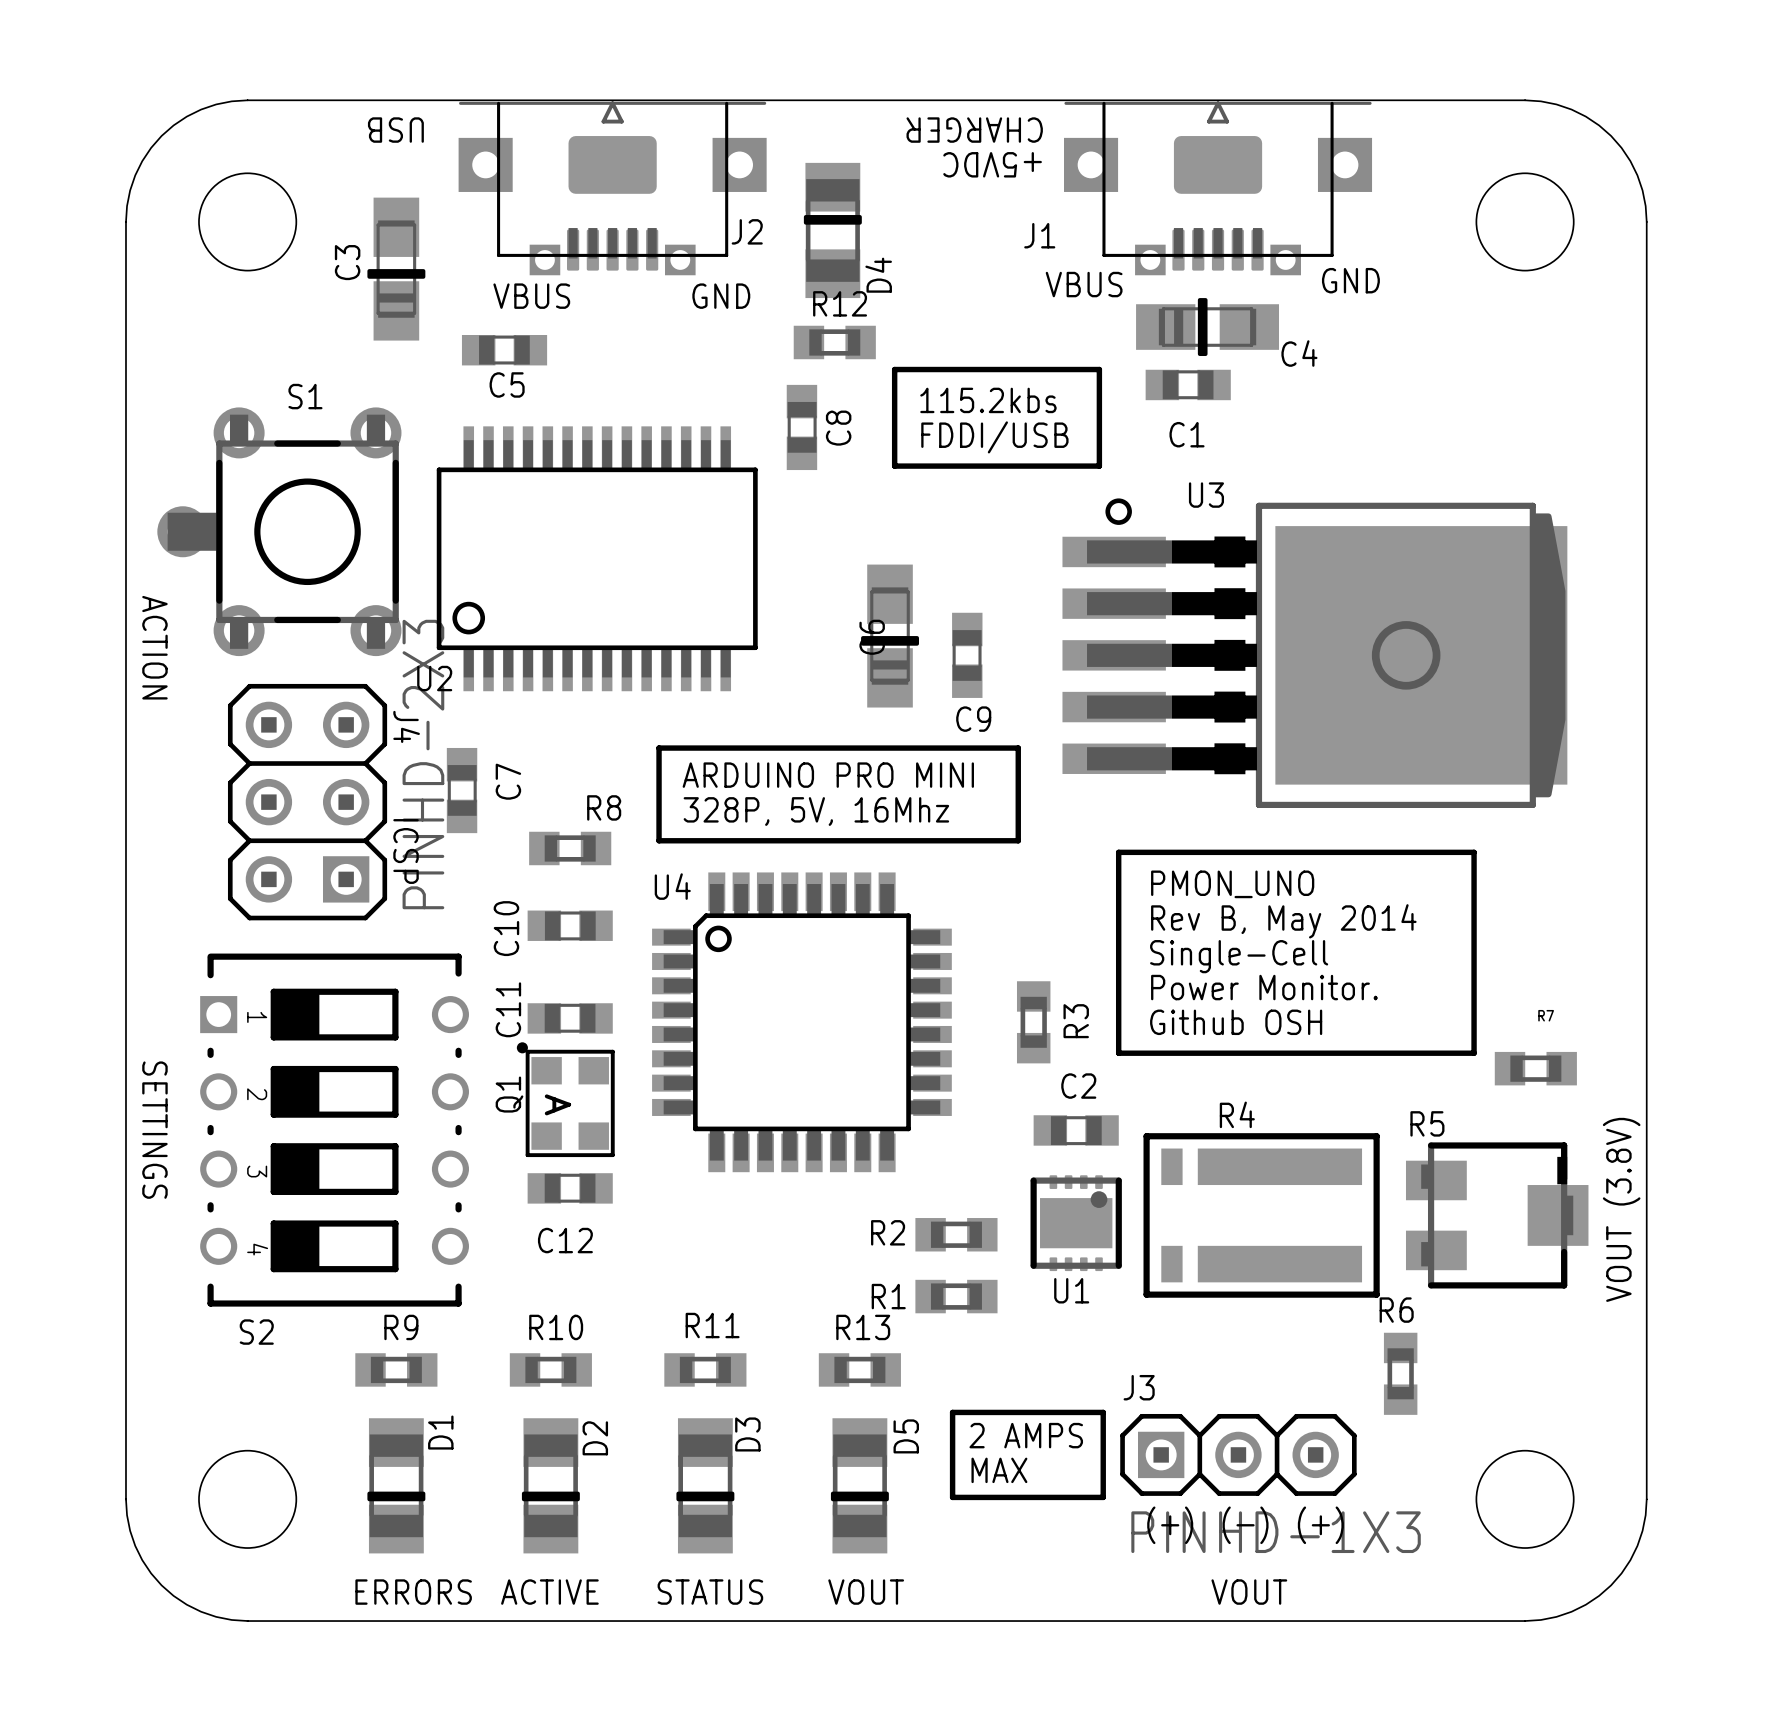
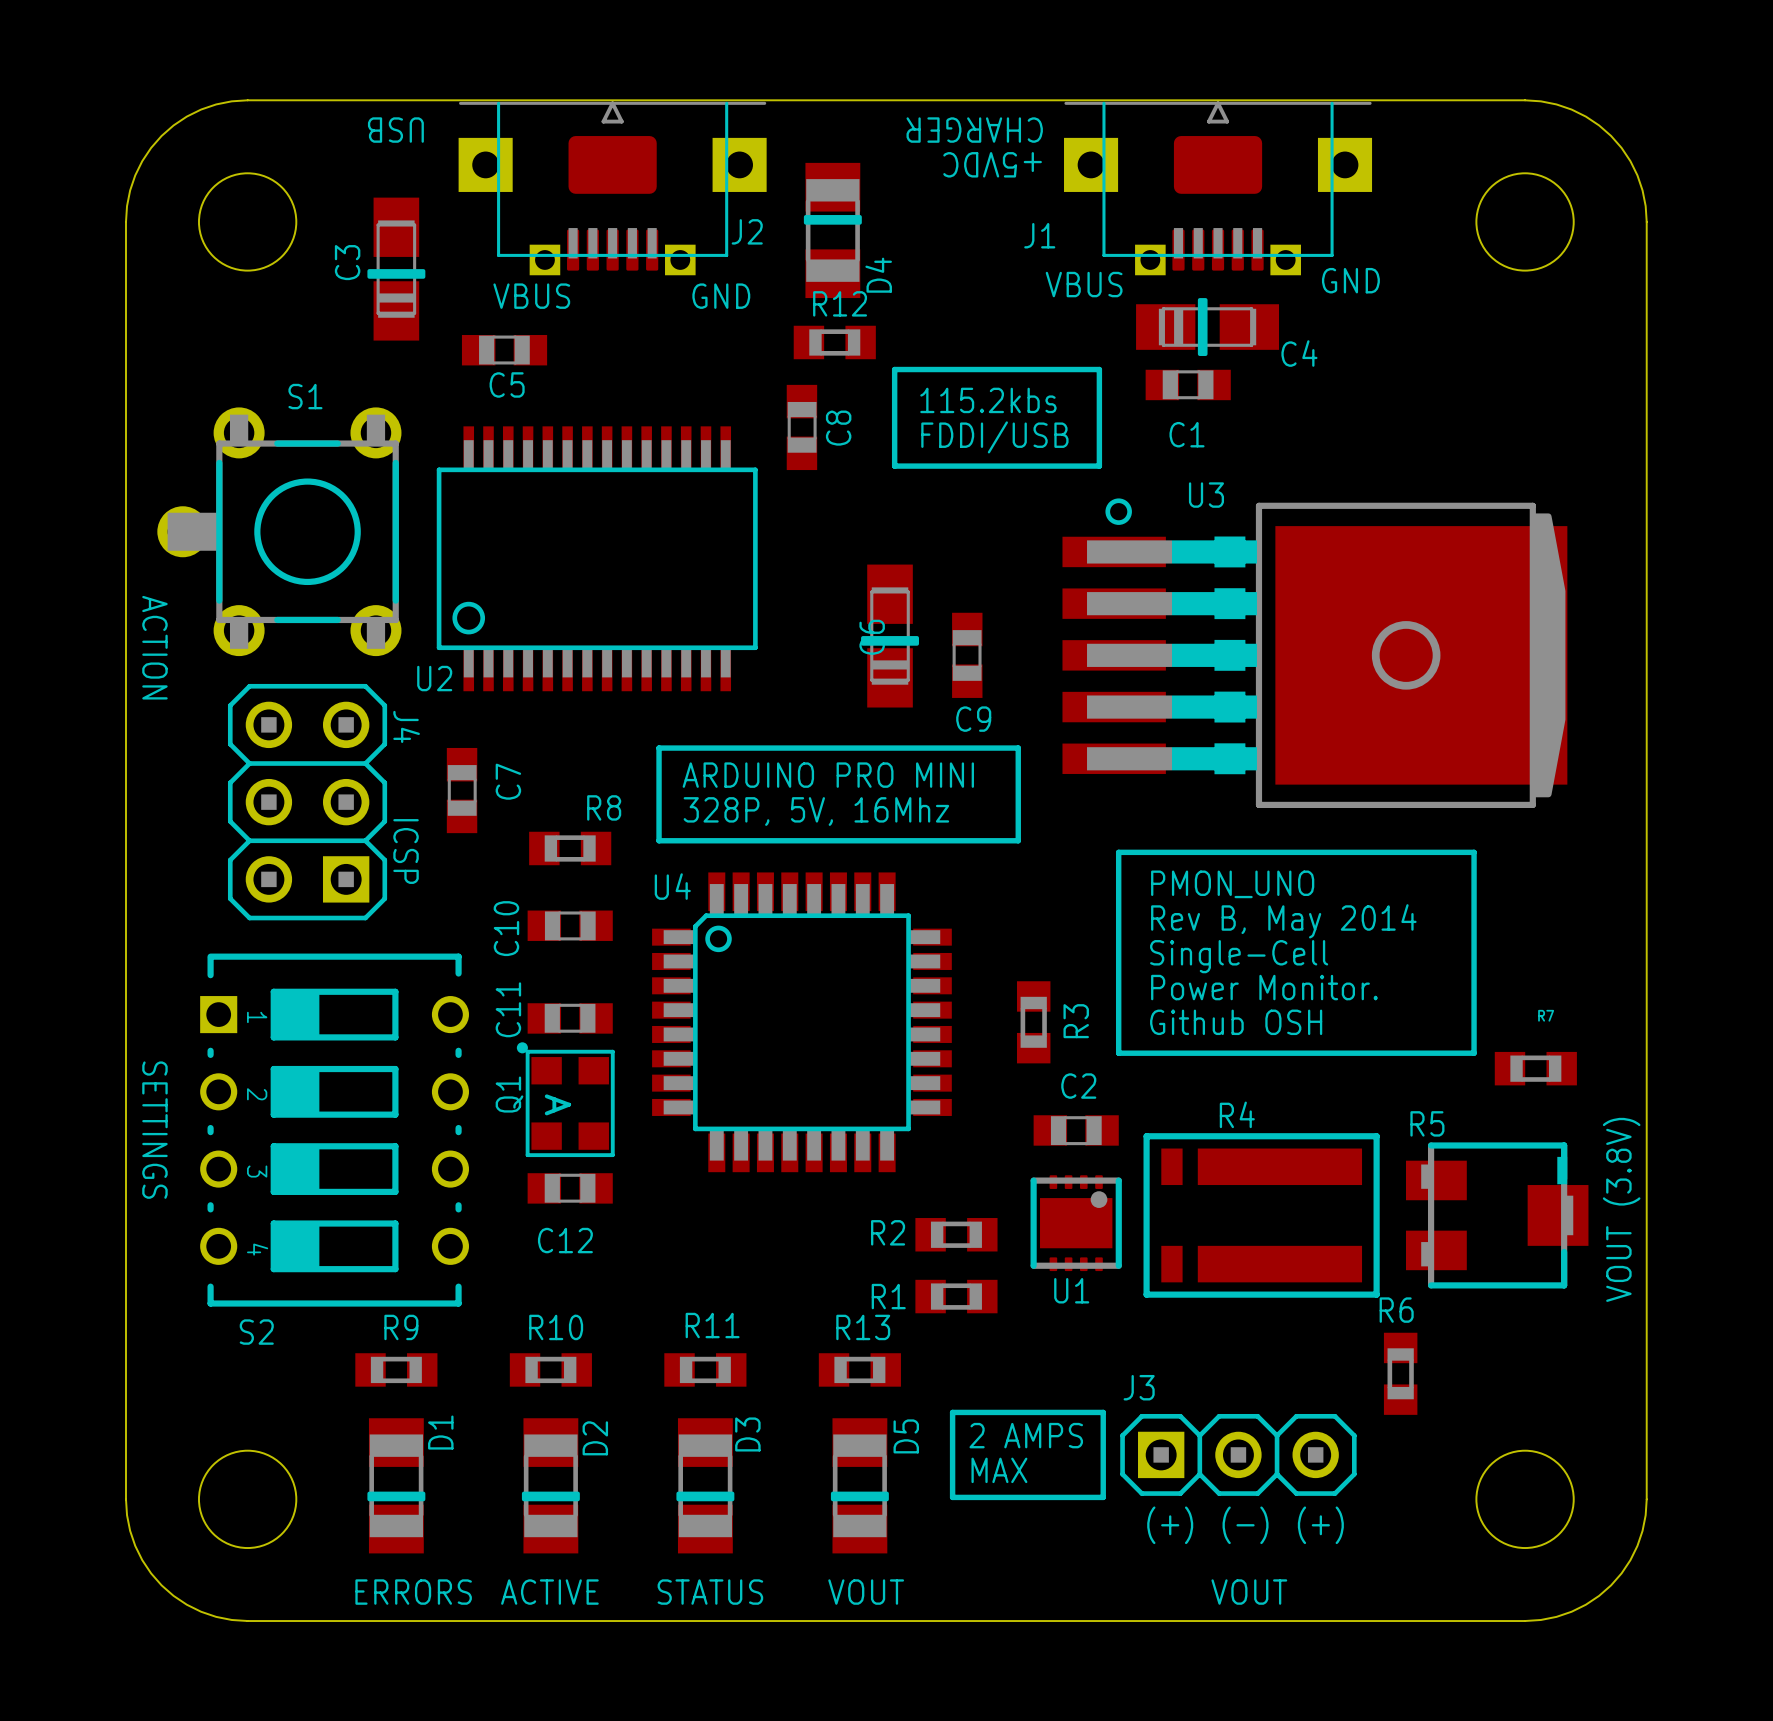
J4 value: PINHD-2X3 (423, 764) -> none
J3 value: PINHD-1X3 (1276, 1532) -> none

